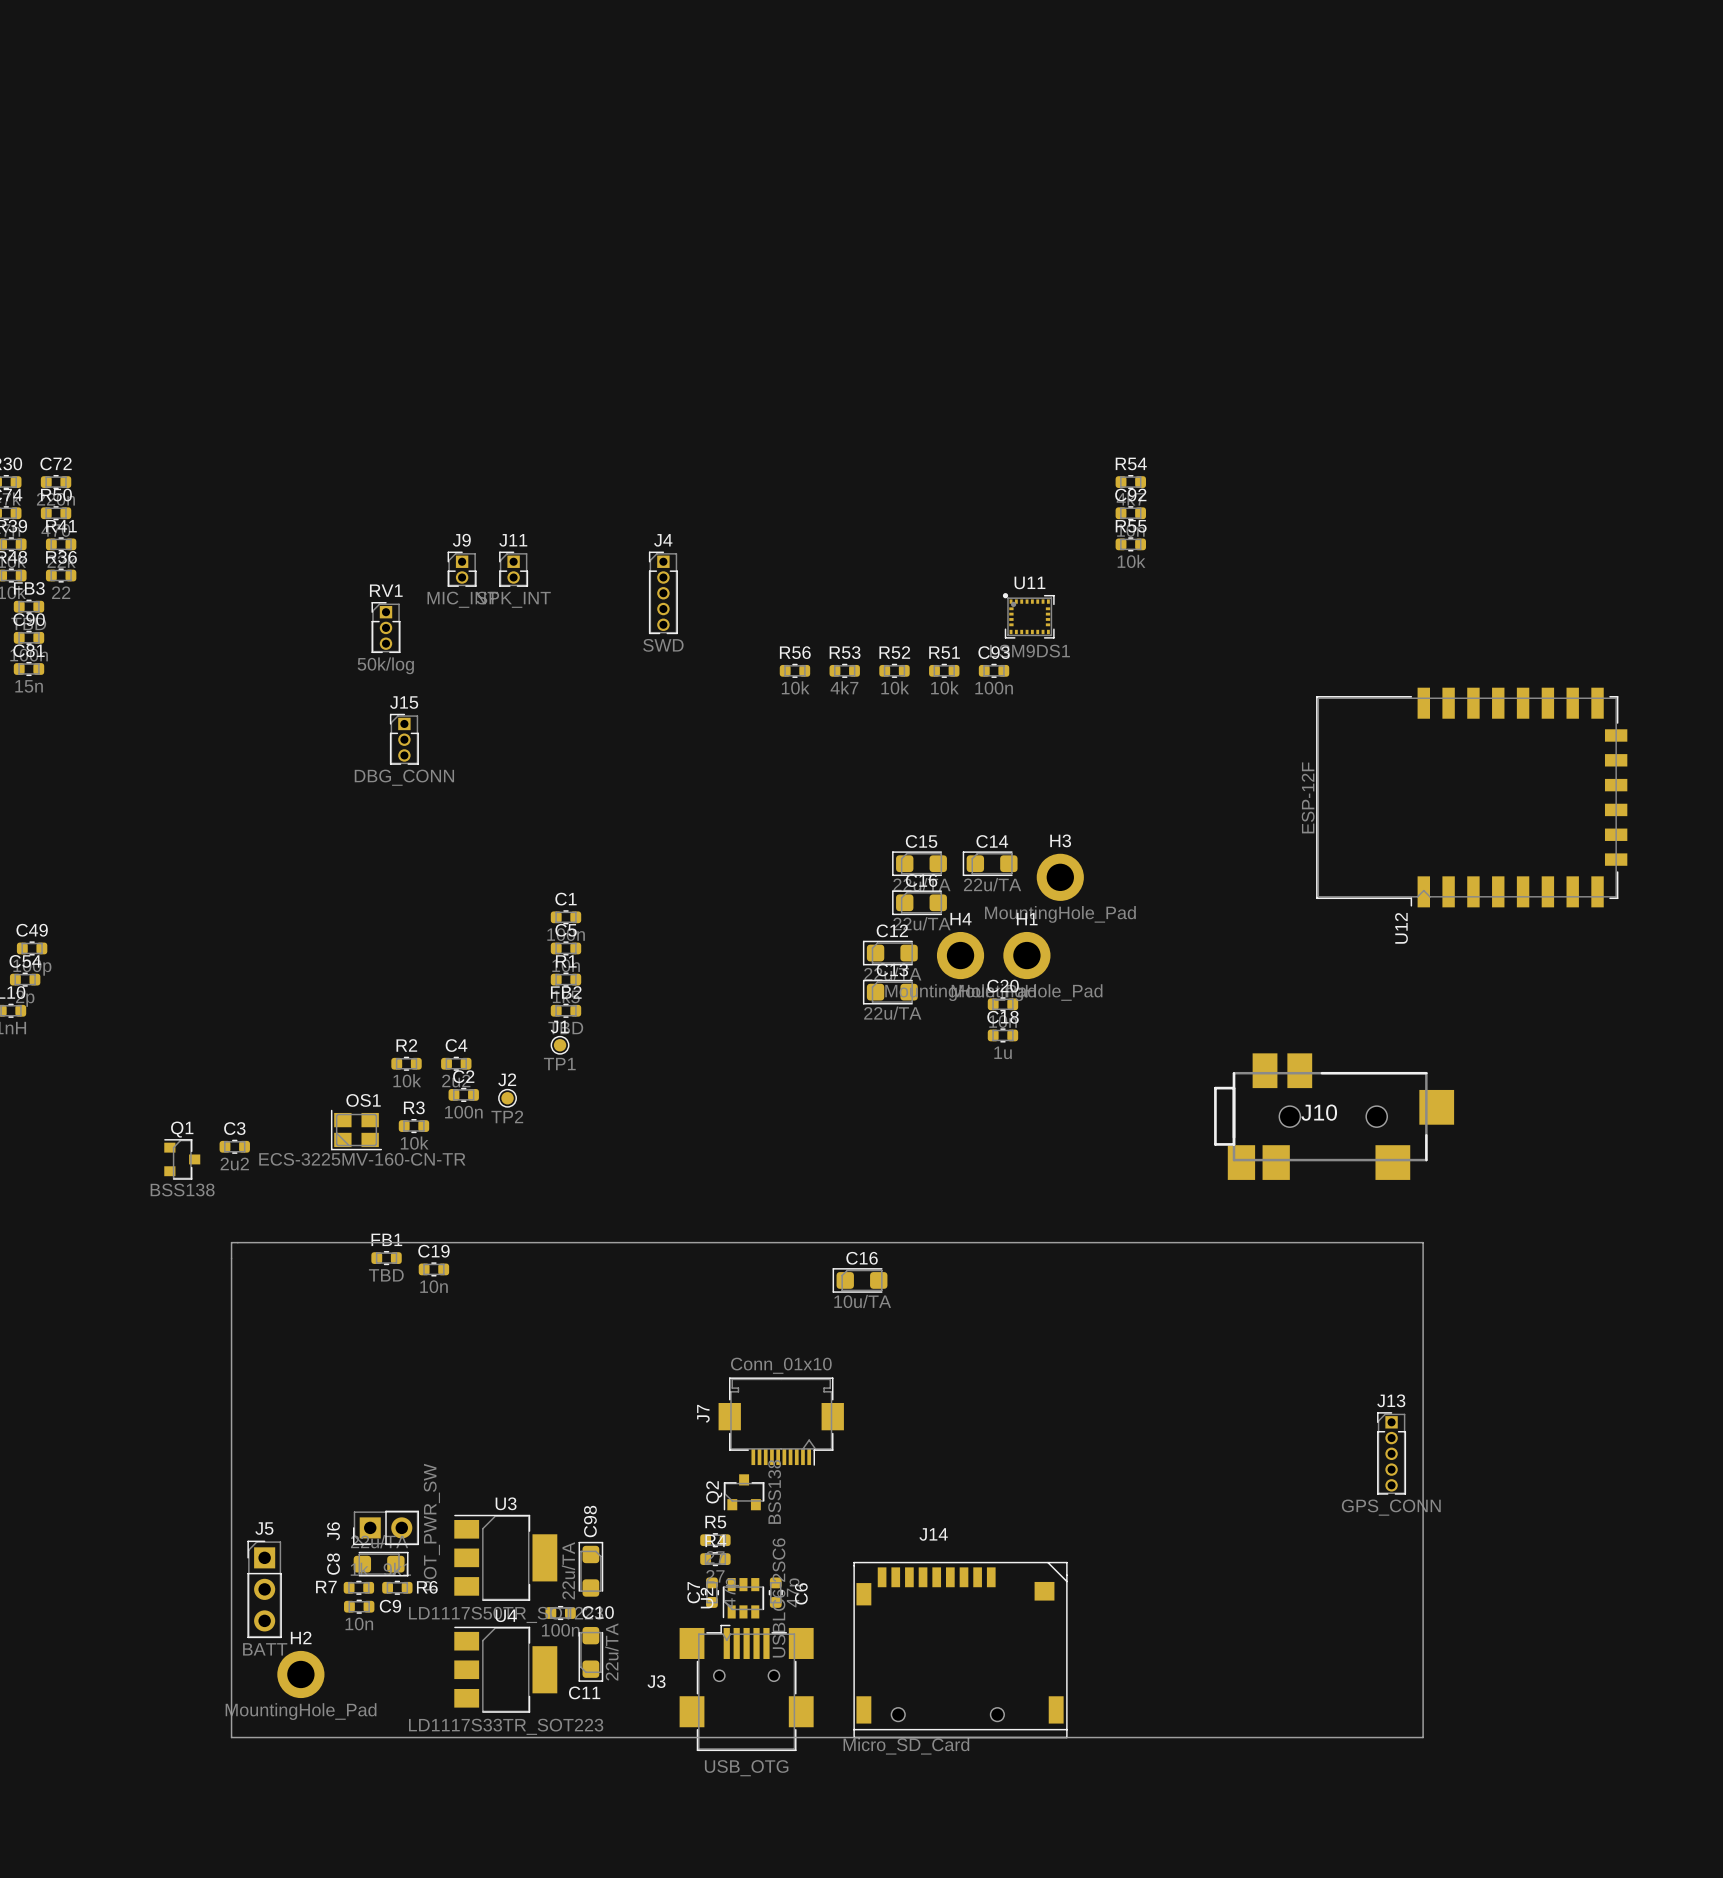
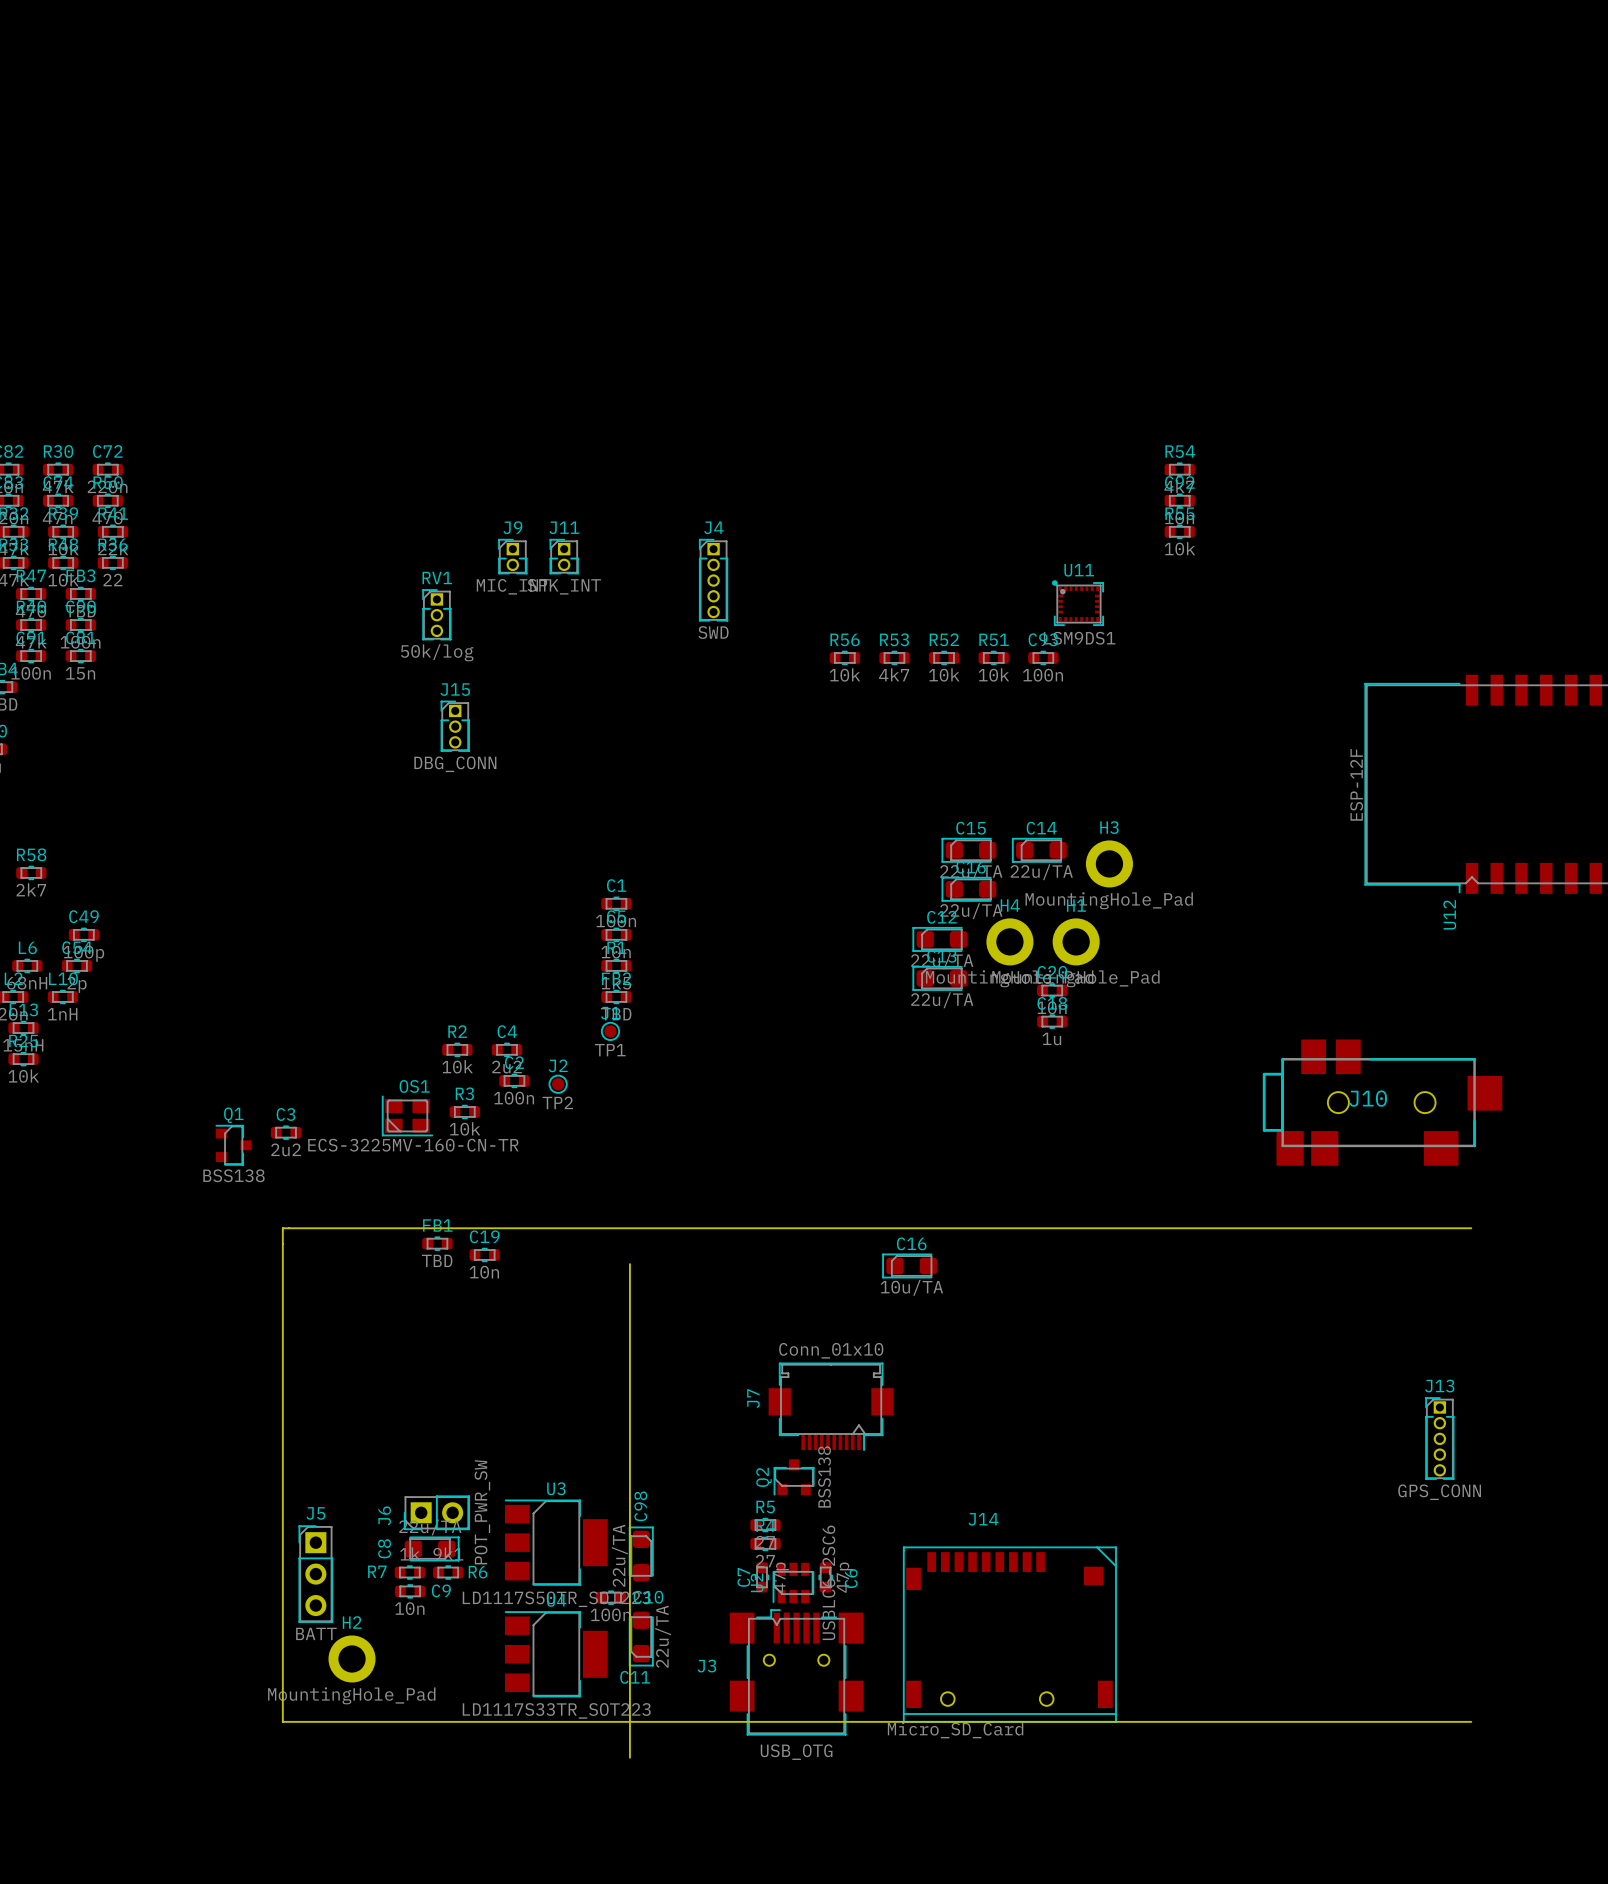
board edge: (1423, 1242) (1423, 1737) -> none
board edge: none -> (629, 1264) (629, 1757)

